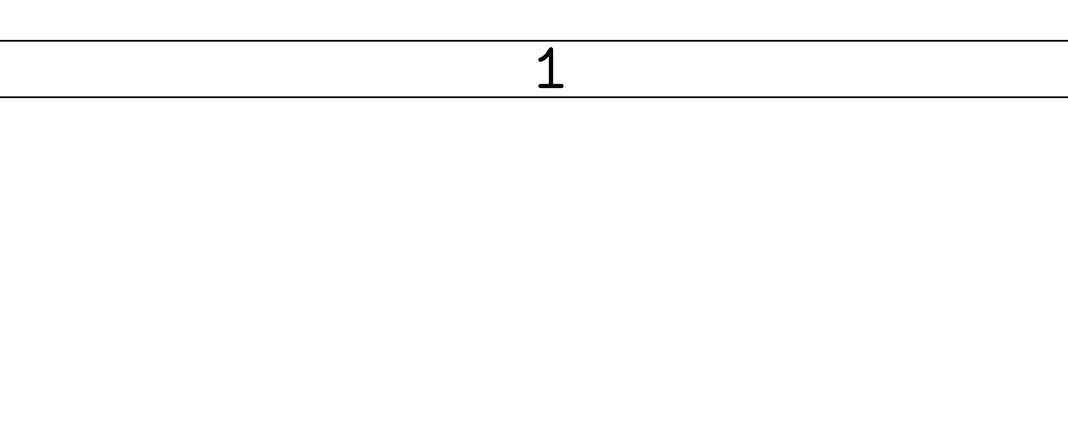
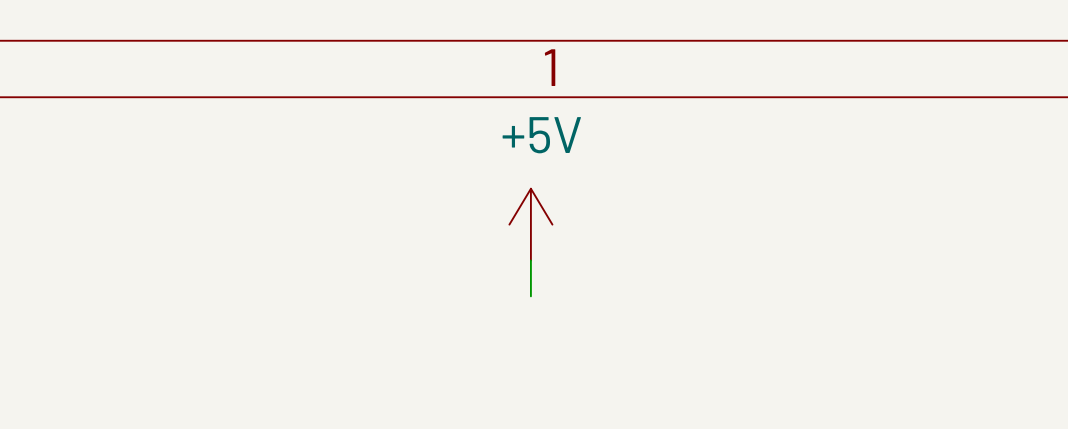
power symbol: none -> +5V (530, 224)
wire: none -> (530, 260) (530, 296)

